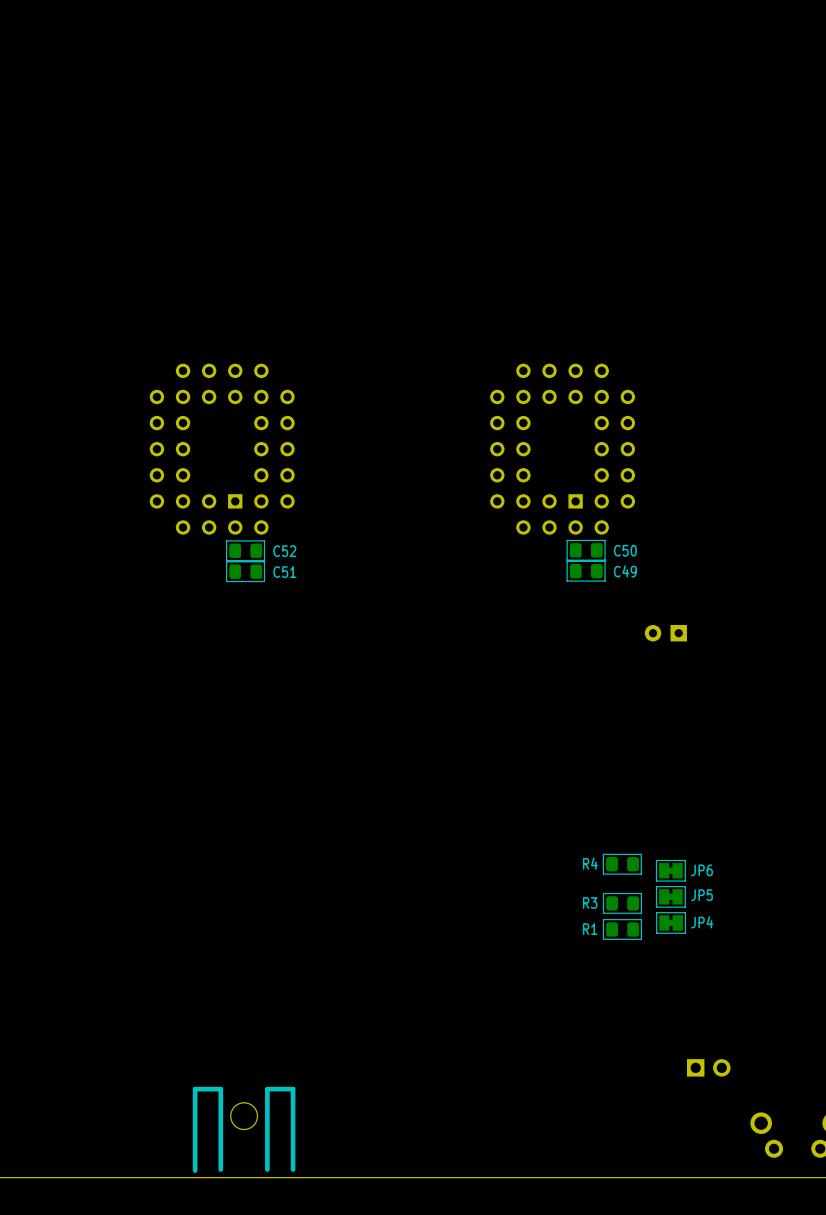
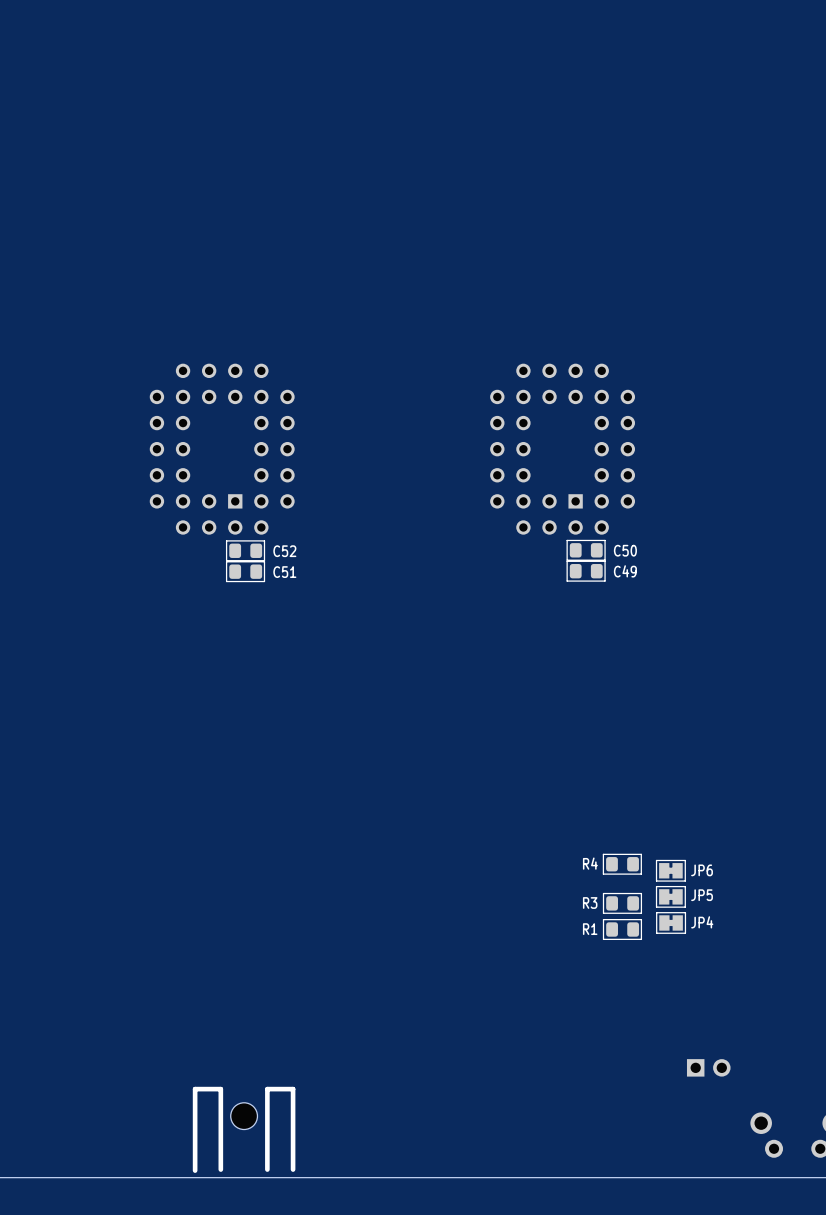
part: (665, 633) -> none

